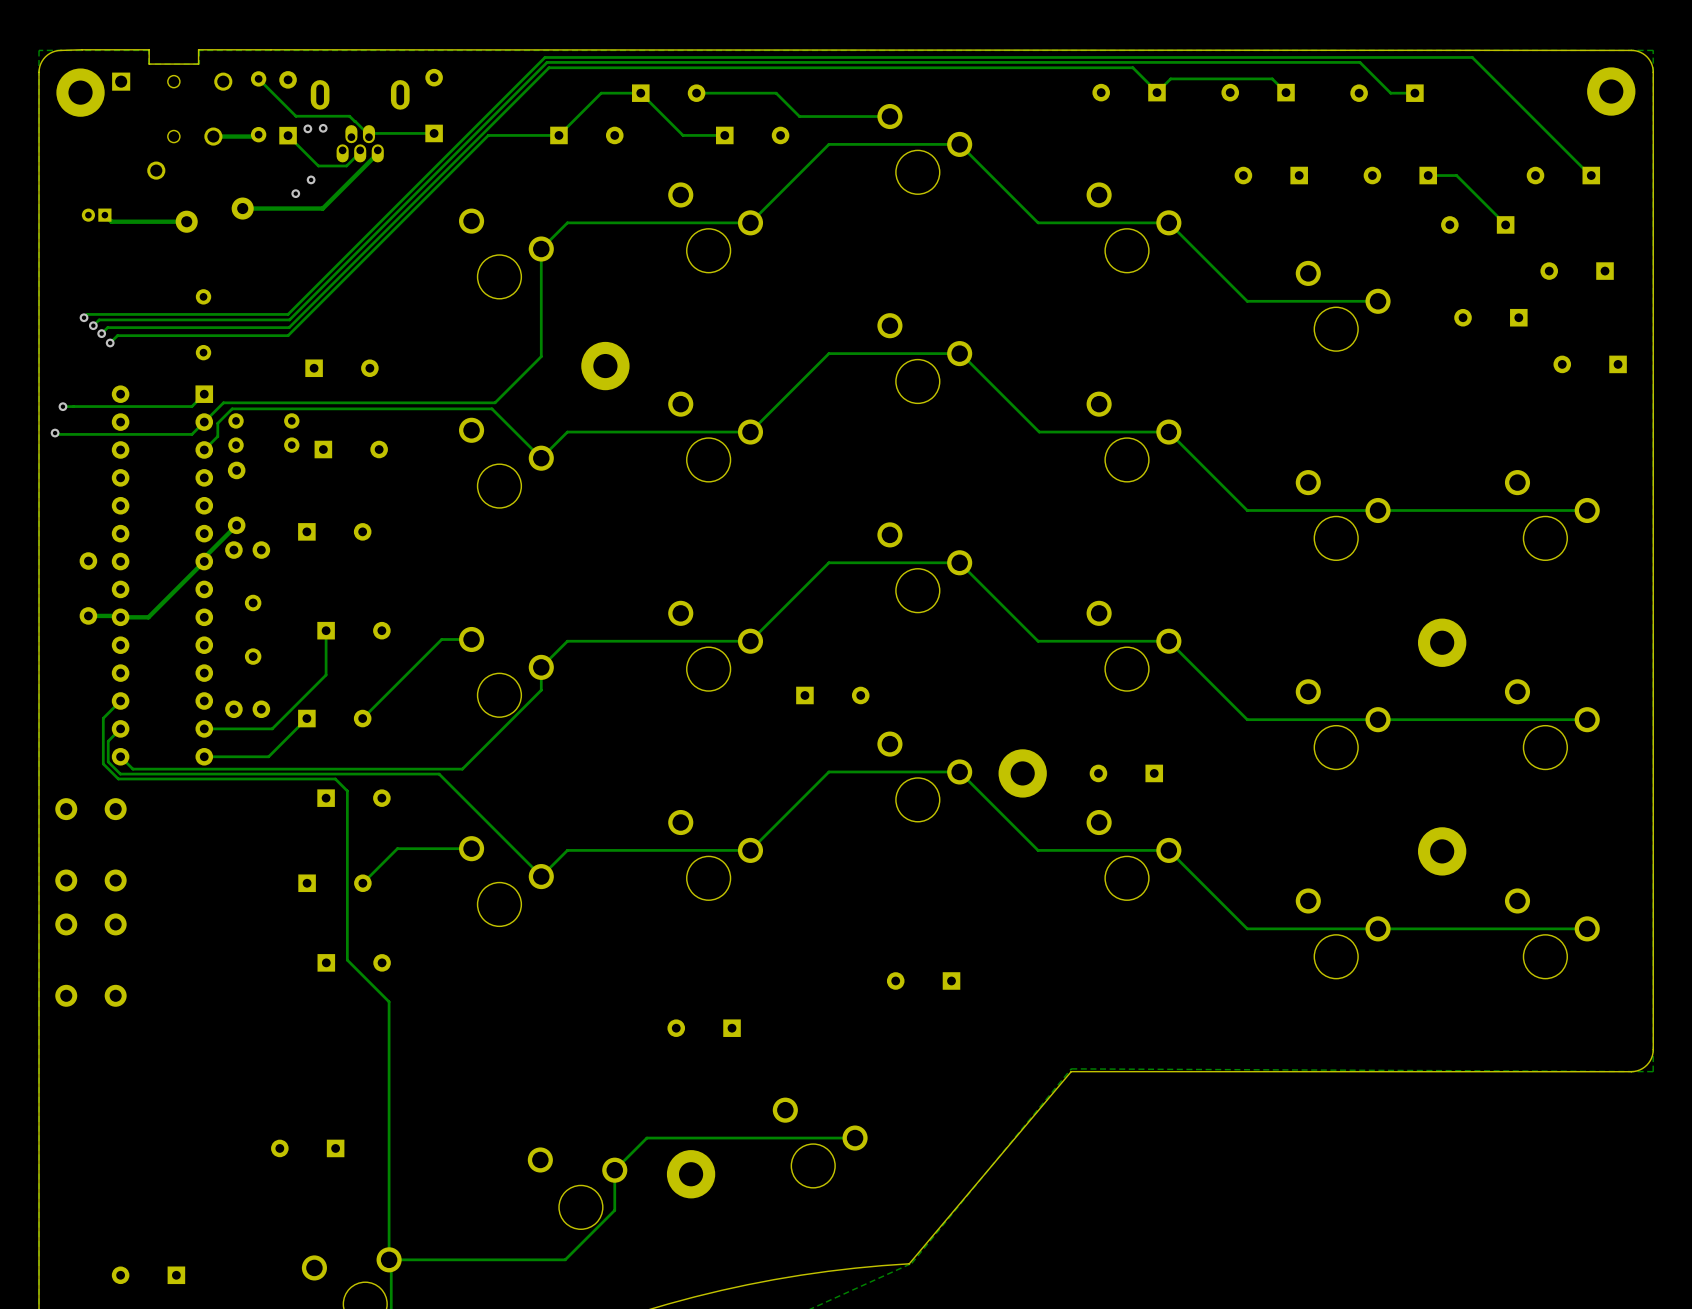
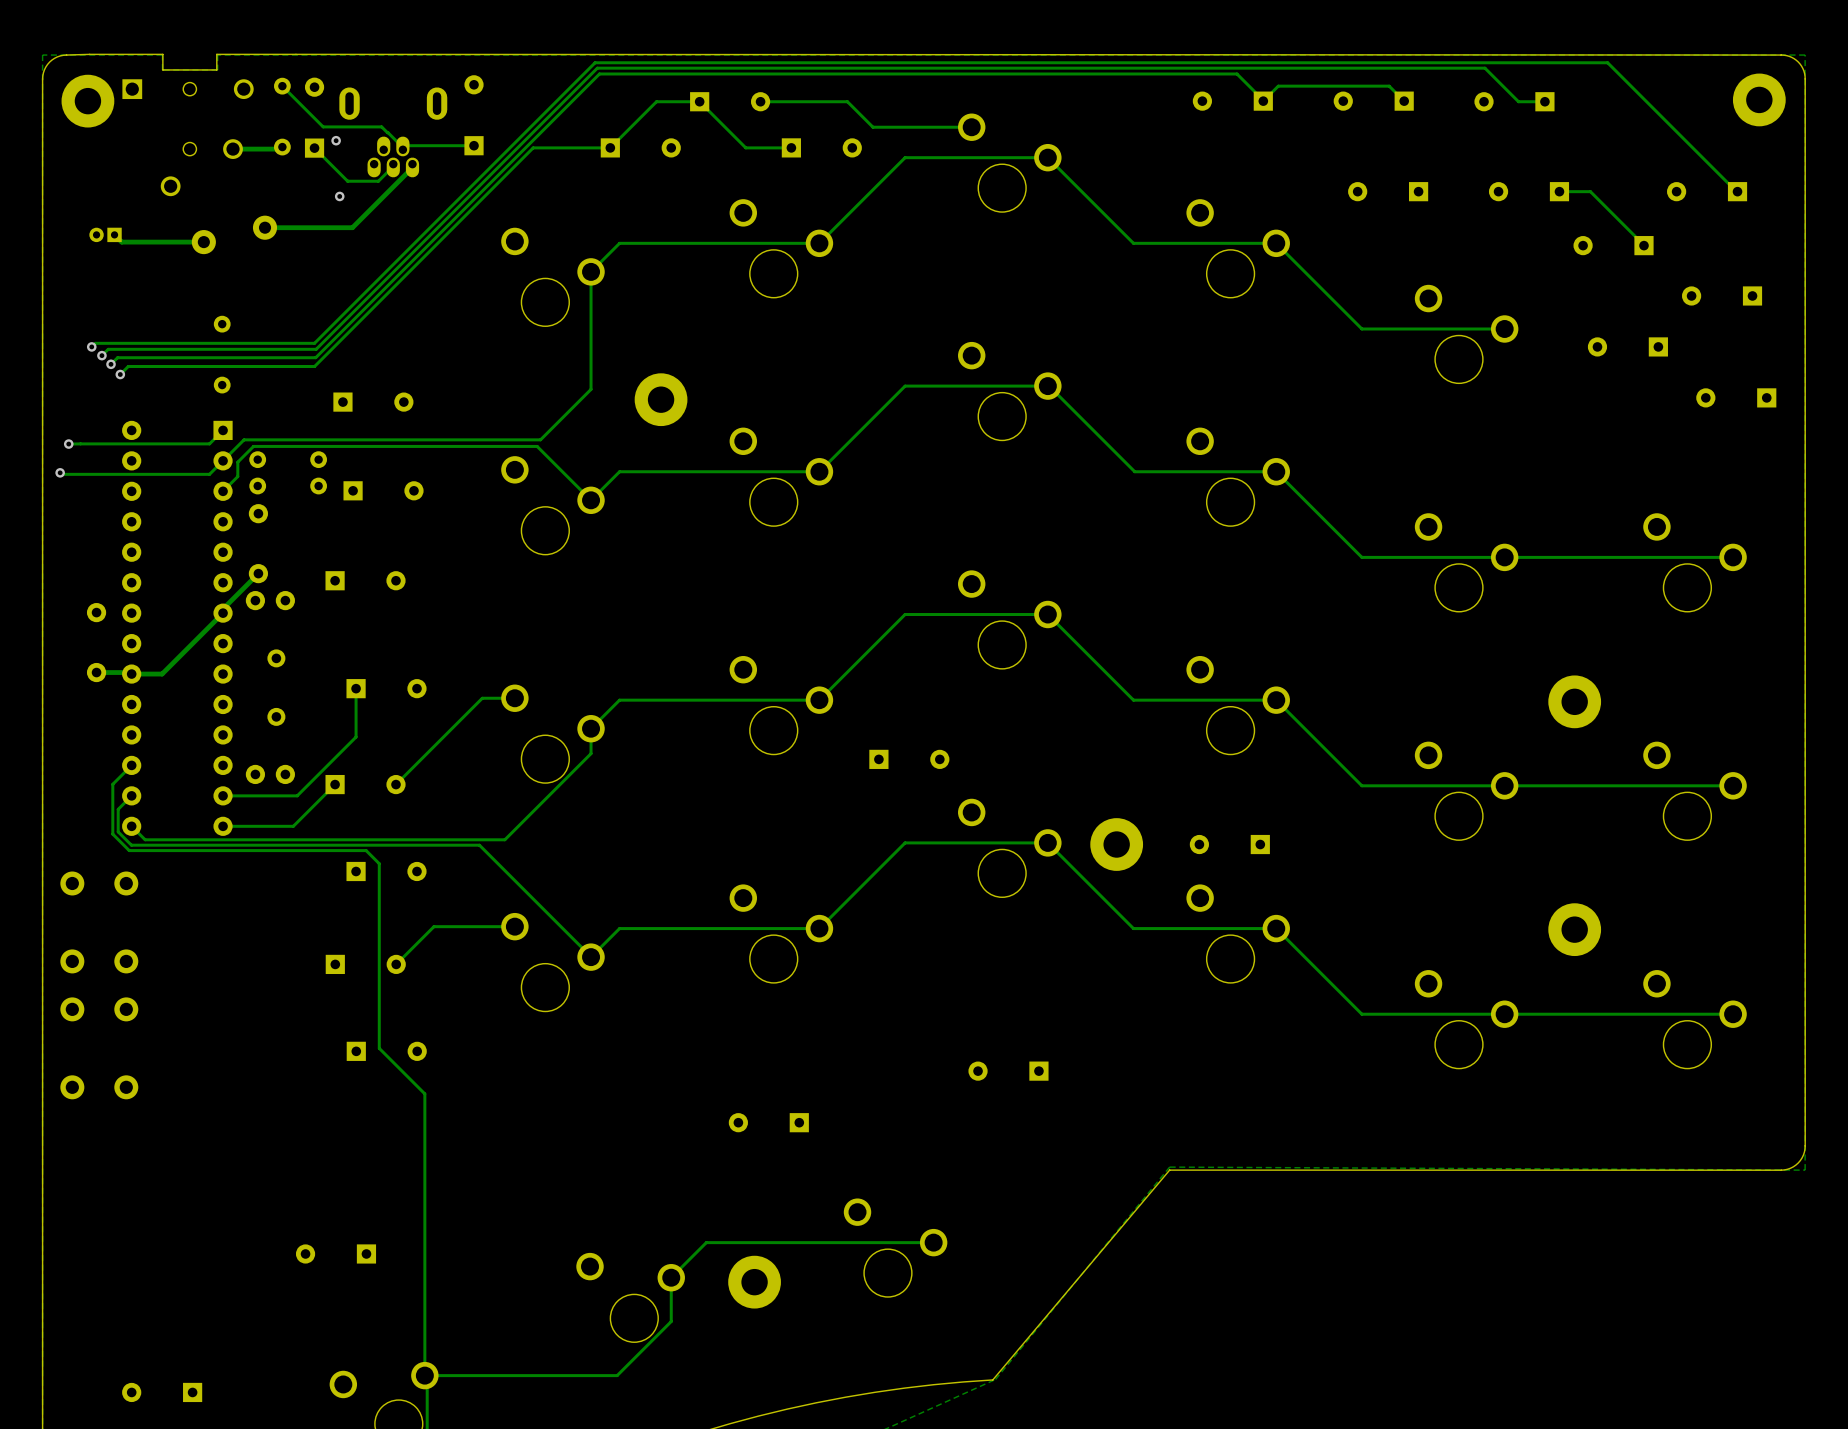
via: (323, 128) -> none
via: (295, 193) -> none

